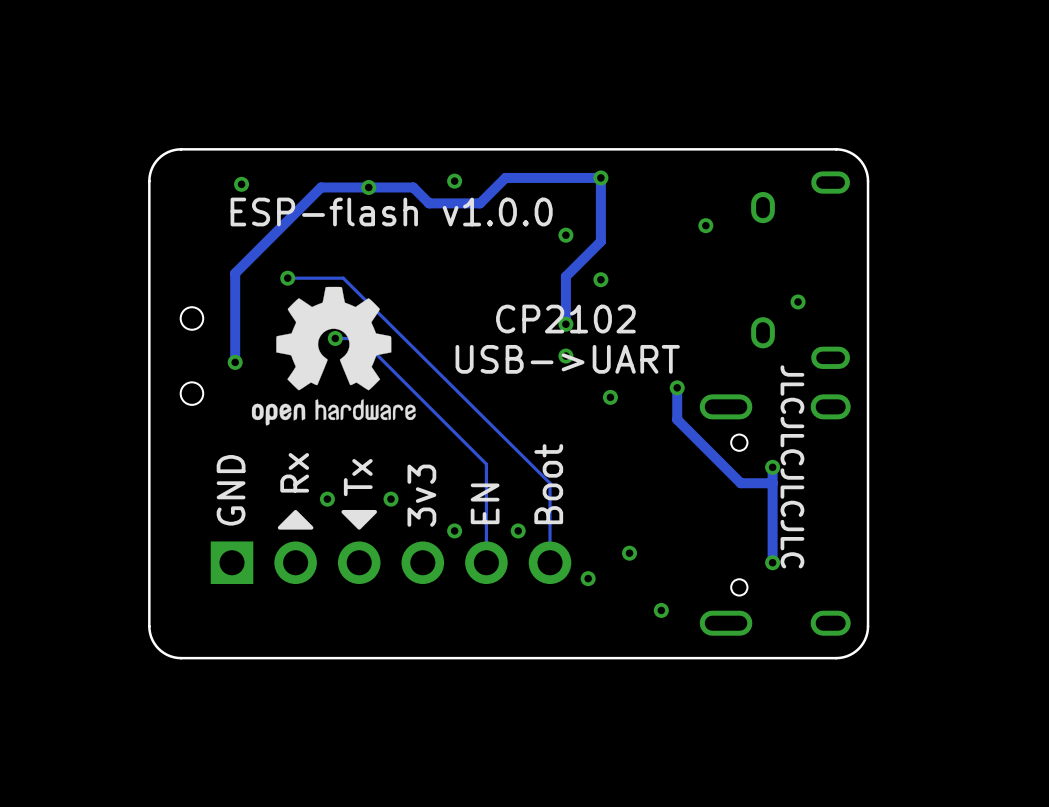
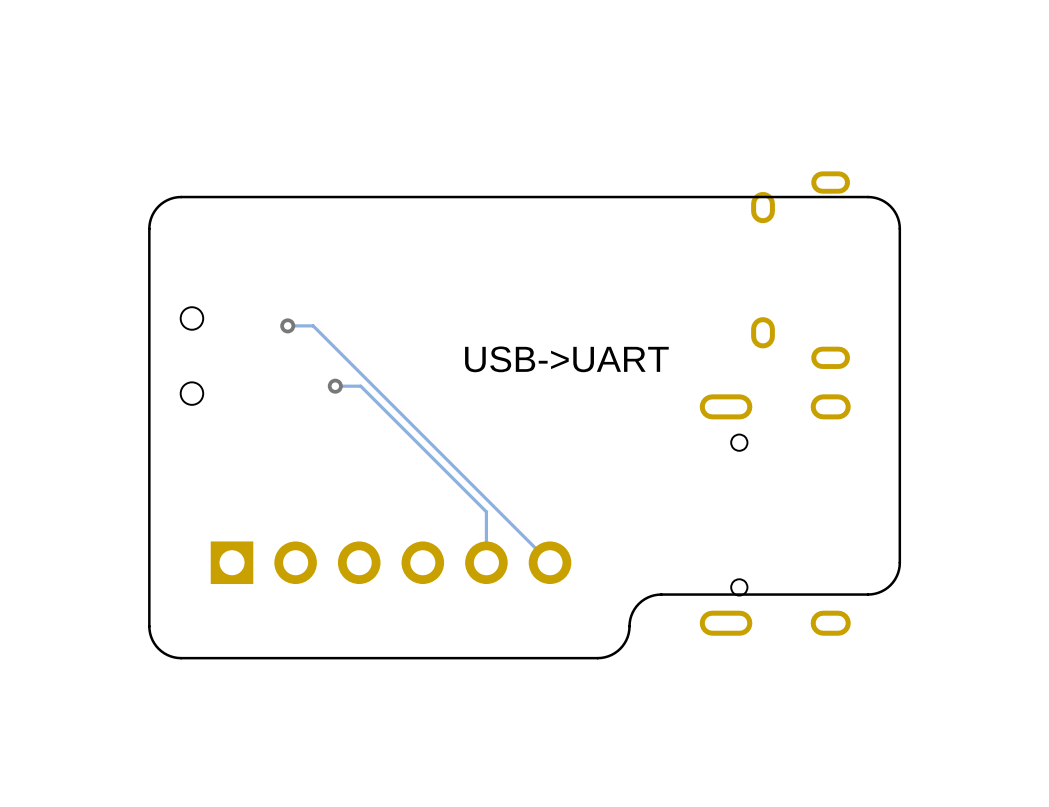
via: (600, 177) -> none
via: (454, 181) -> none
via: (241, 184) -> none
via: (368, 187) -> none
text: ESP-flash v1.0.0 (391, 212) -> none
via: (705, 225) -> none
board edge: (149, 228) (151, 170) (161, 156) (177, 149) (836, 149) (850, 152) (858, 158) (866, 170) (868, 181) (868, 626) (864, 640) (853, 653) (839, 657) (597, 658) -> (149, 228) (151, 218) (158, 206) (167, 200) (181, 197) (868, 197) (881, 200) (890, 206) (898, 218) (899, 228) (899, 562) (894, 579) (884, 589) (871, 594) (654, 595) (644, 599) (634, 609) (630, 619) (627, 636) (620, 648) (608, 656) (597, 658)
via: (565, 235) -> none
track: (287, 278) (343, 278) (550, 483) (550, 562) -> (287, 325) (313, 325) (550, 562)
via: (287, 278) -> none
via: (600, 279) -> none
drawing: [251, 286, 416, 426] -> none
via: (798, 301) -> none
text: CP2102 (565, 319) -> none
track: (565, 324) (565, 276) (600, 241) (600, 177) (505, 177) (480, 203) (429, 203) (413, 187) (321, 187) (235, 273) (235, 362) -> none
via: (565, 324) -> none
via: none -> (287, 325)
track: (335, 338) (360, 338) (486, 464) (486, 511) -> (335, 386) (360, 386) (486, 511)
via: (335, 338) -> none
via: (565, 356) -> none
via: (235, 362) -> none
via: none -> (335, 386)
track: (677, 387) (677, 419) (740, 483) (772, 483) -> none
via: (677, 387) -> none
via: (610, 397) -> none
text: JLCJLCJLCJLC (792, 466) -> none
track: (772, 467) (772, 562) -> none
via: (772, 467) -> none
text: Rx (294, 472) -> none
text: Tx (358, 477) -> none
text: Boot (548, 484) -> none
text: GND (231, 490) -> none
text: 3v3 (421, 495) -> none
via: (327, 499) -> none
via: (391, 499) -> none
text: EN (485, 503) -> none
drawing: [277, 509, 377, 530] -> none
via: (454, 530) -> none
via: (518, 530) -> none
via: (629, 553) -> none
via: (772, 562) -> none
via: (588, 578) -> none
via: (661, 610) -> none

